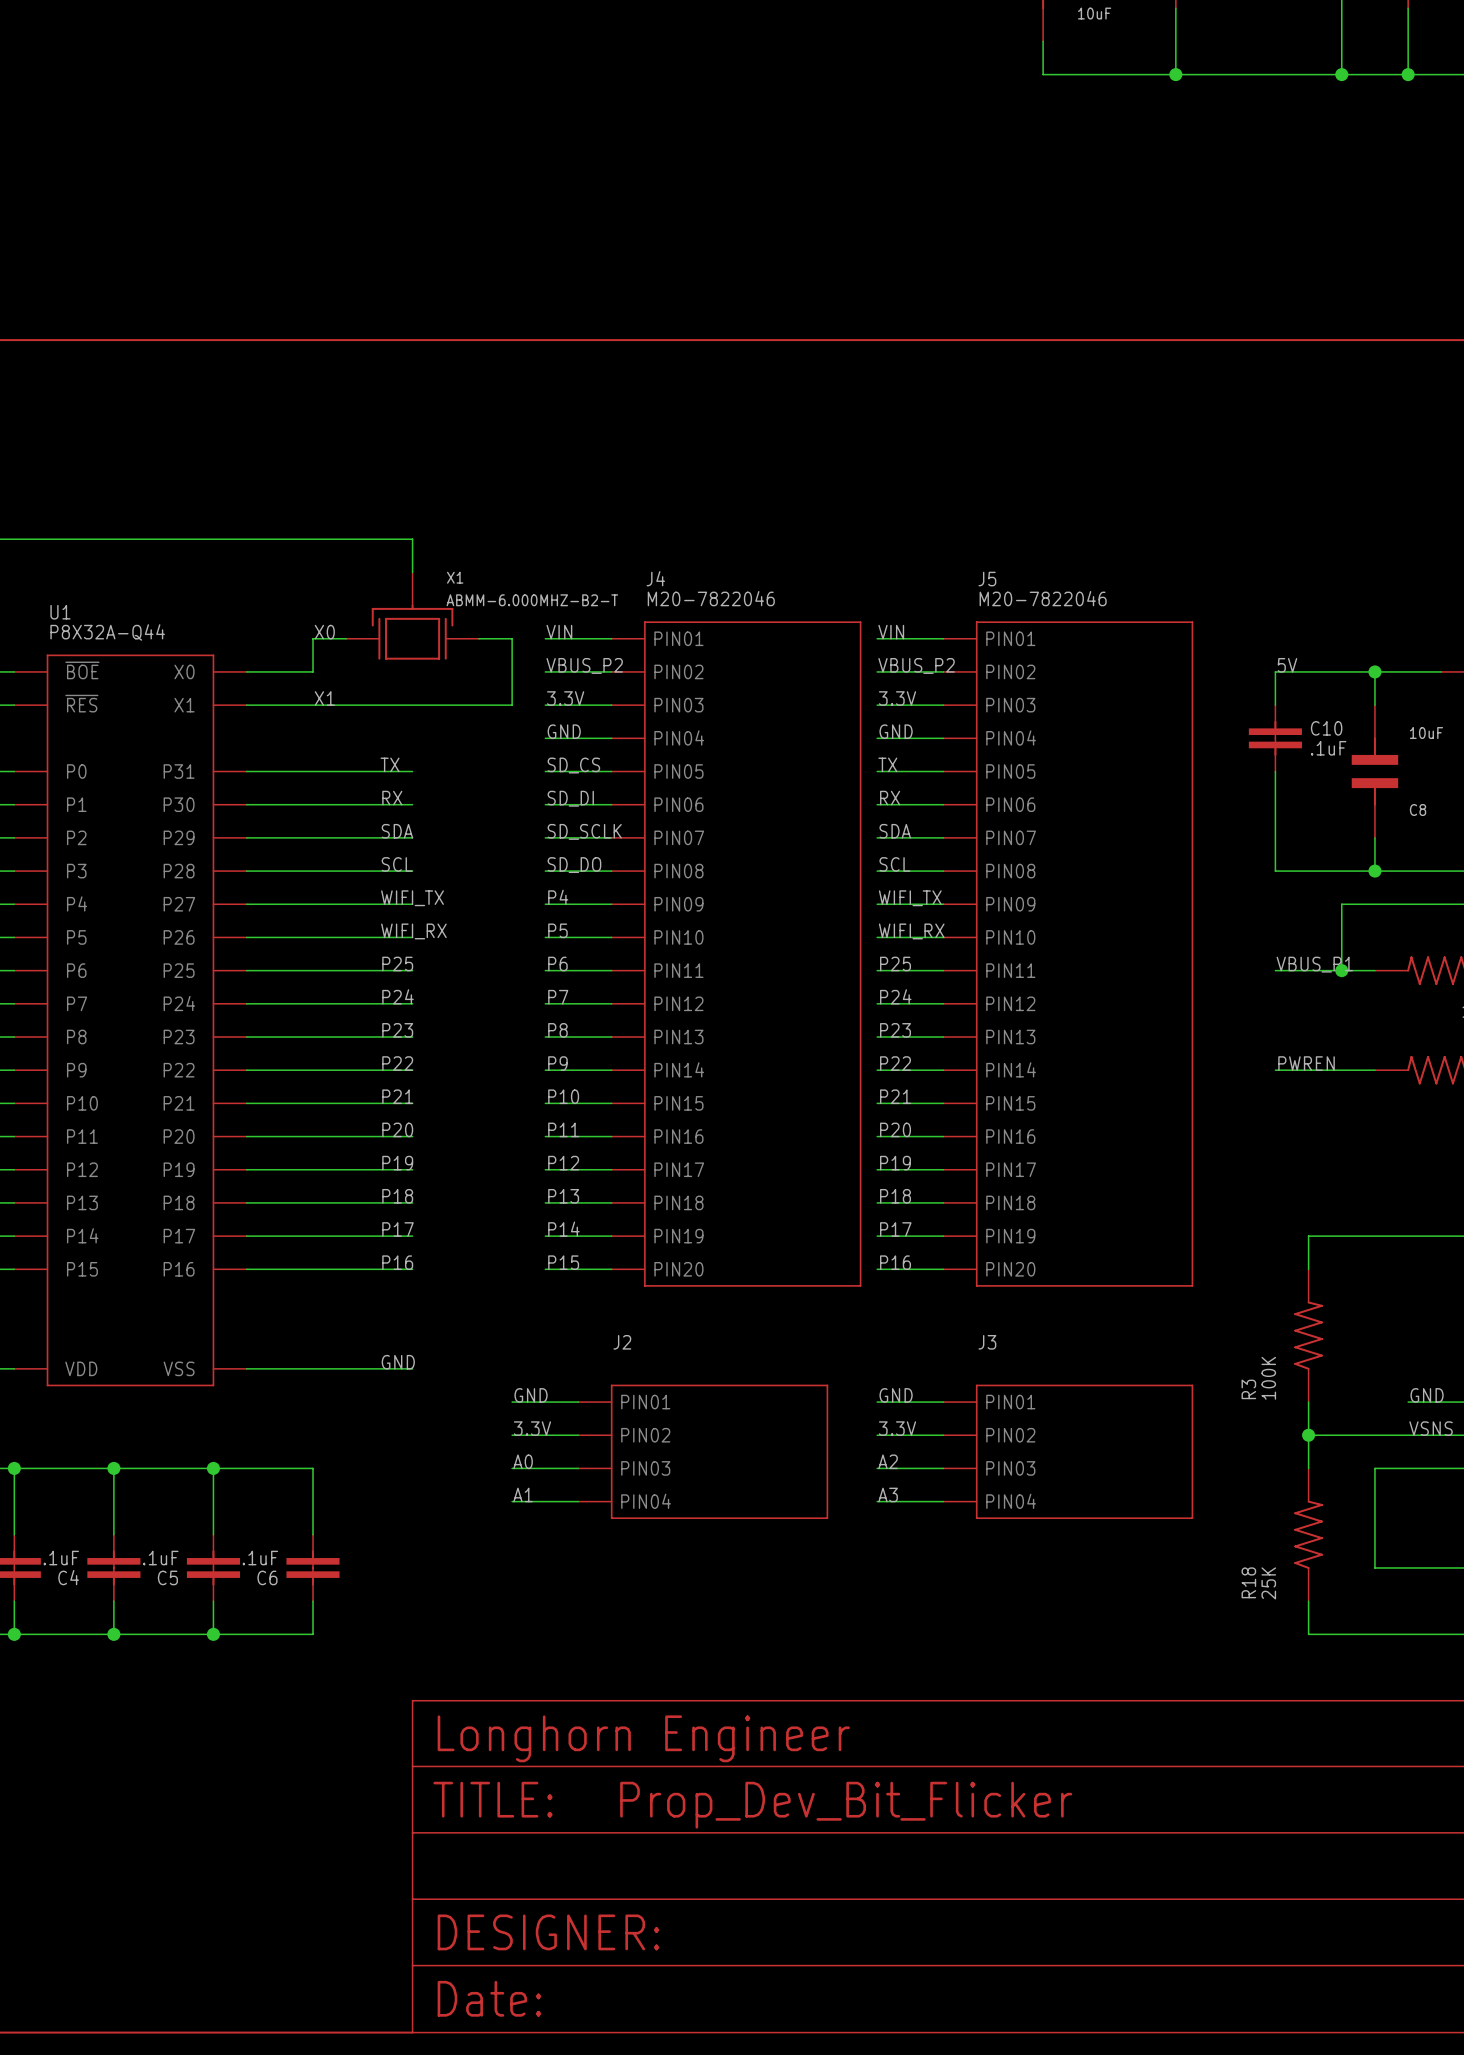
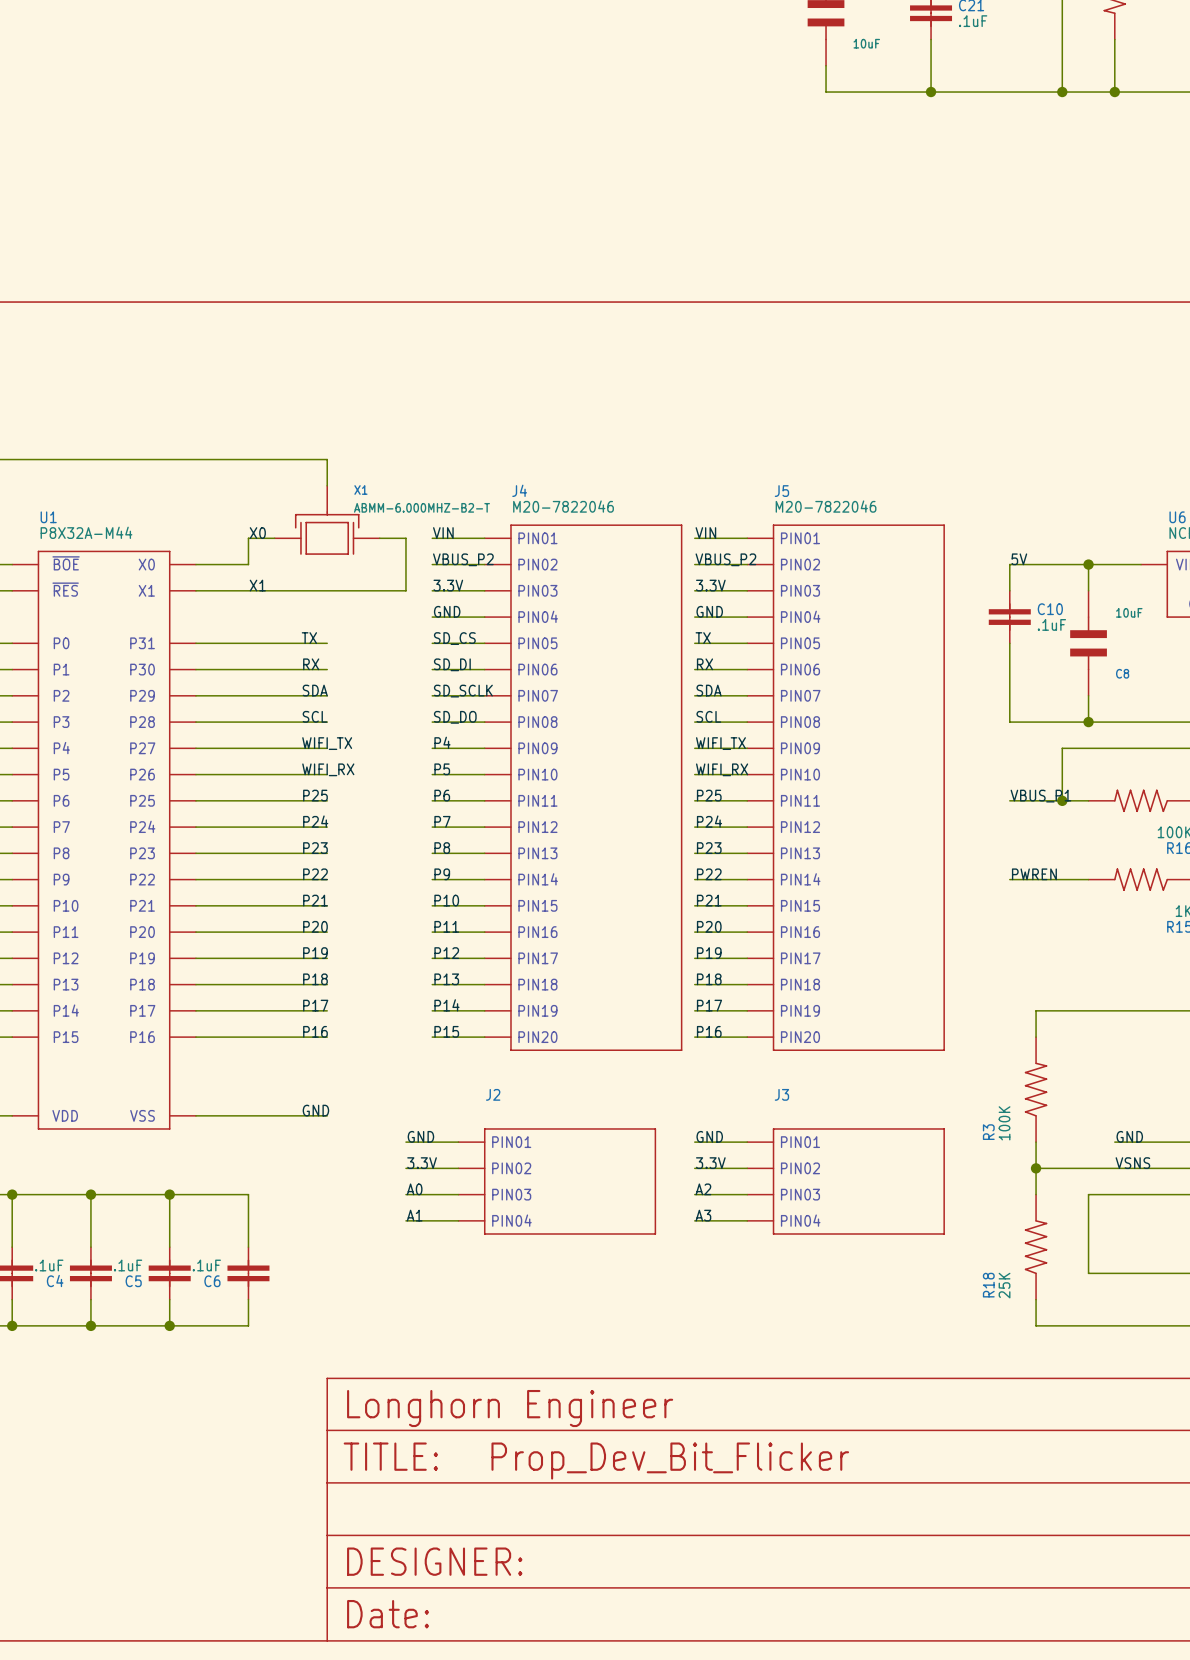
U1 value: P8X32A-Q44 (107, 632) -> P8X32A-M44 (86, 532)

